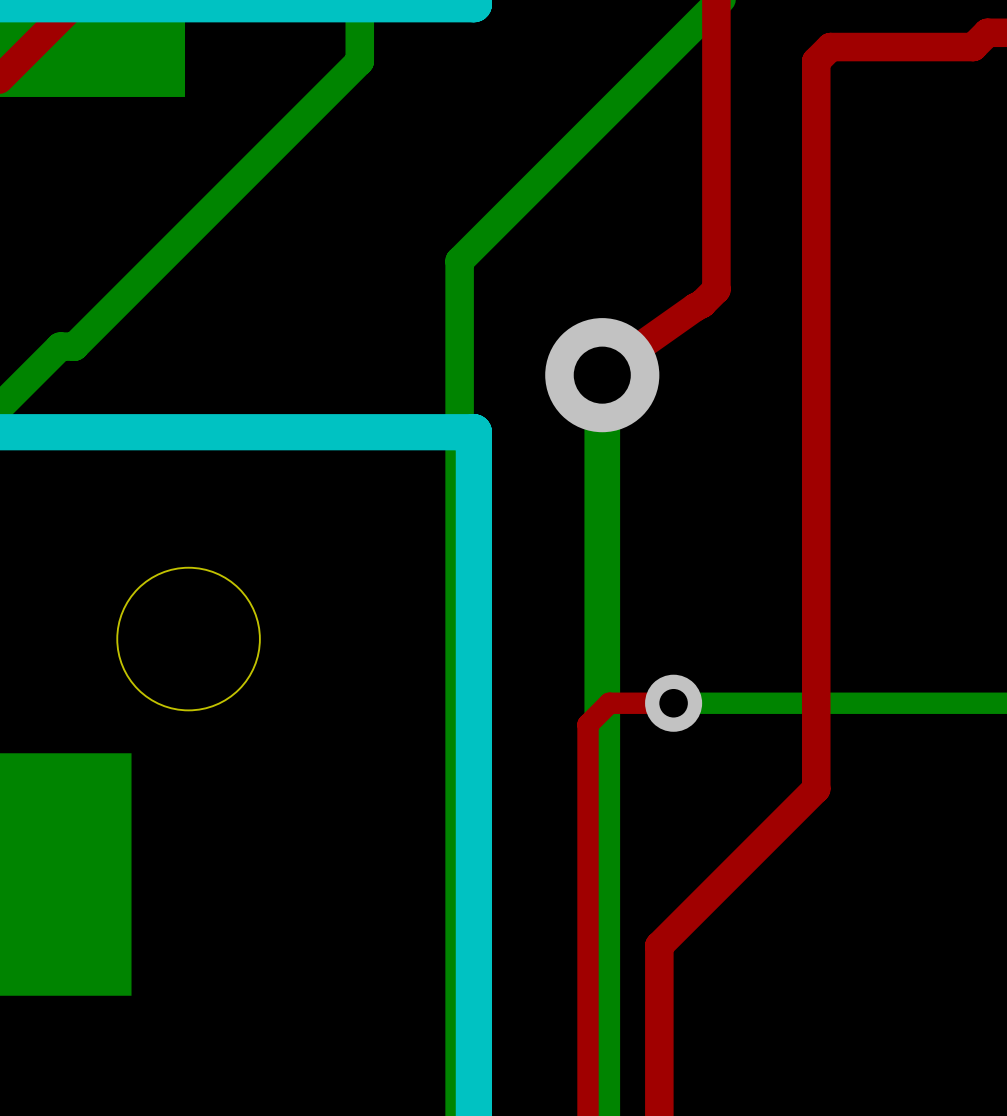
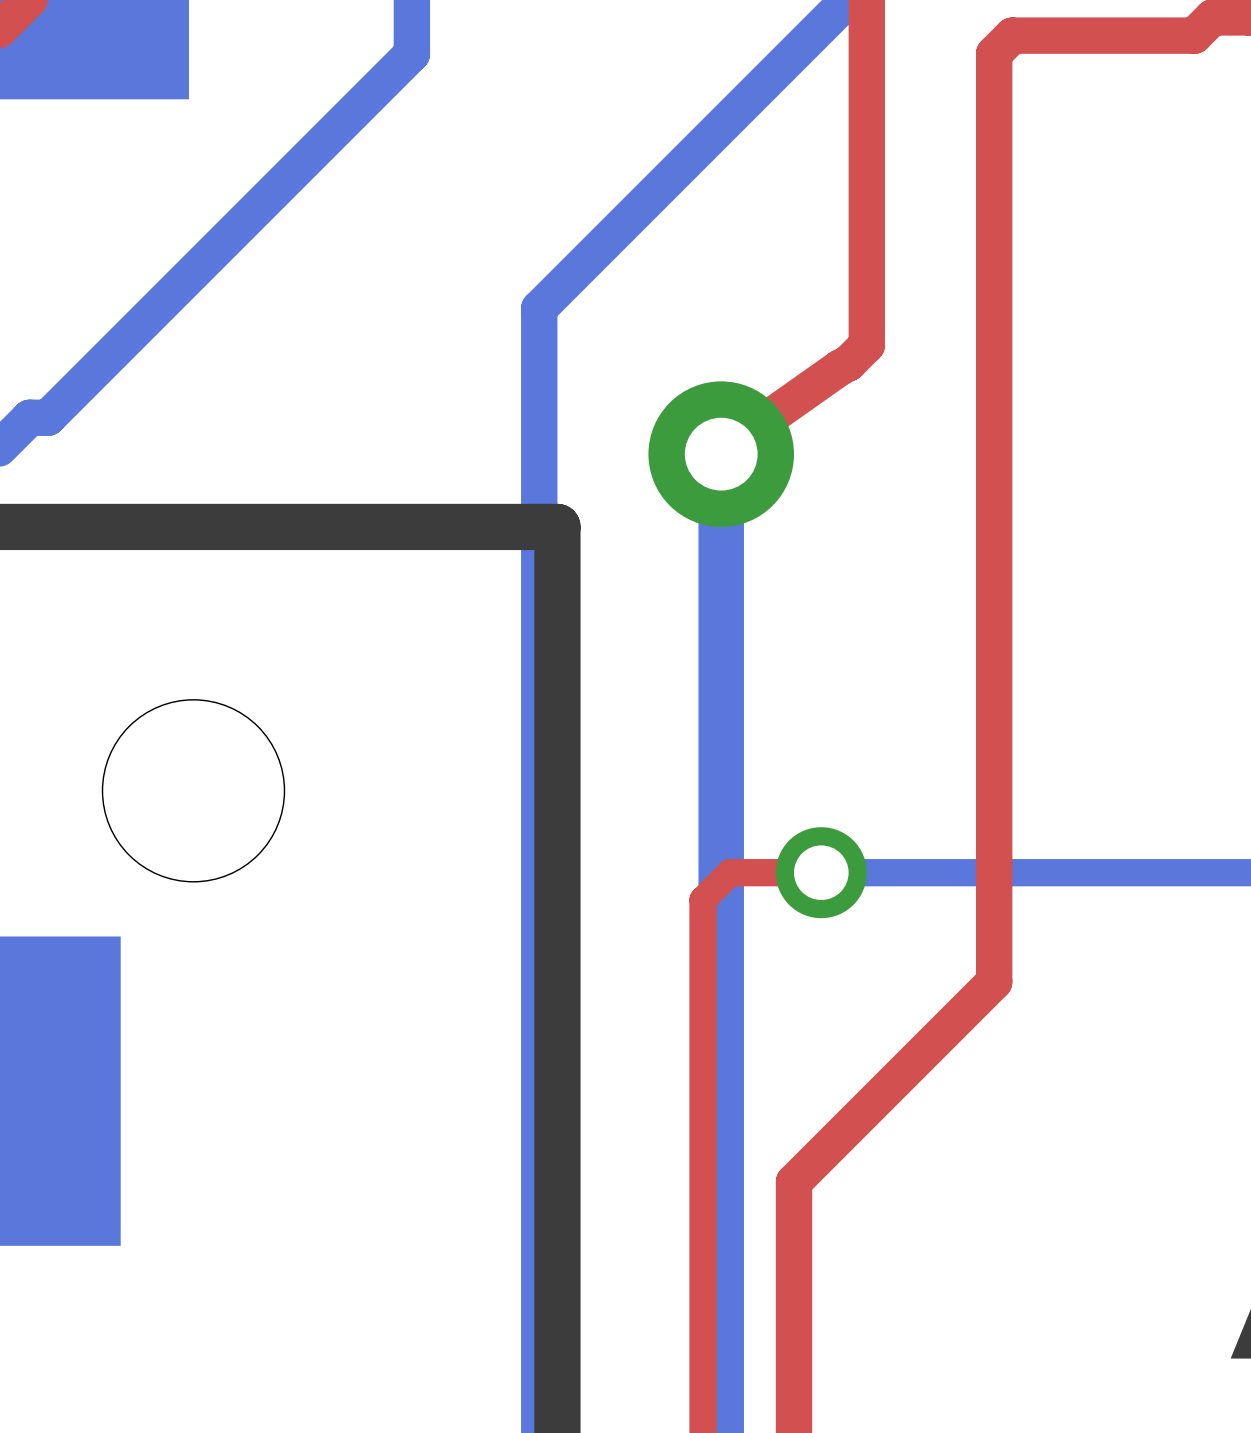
via size: [645, 674, 703, 732] -> [775, 827, 867, 919]

